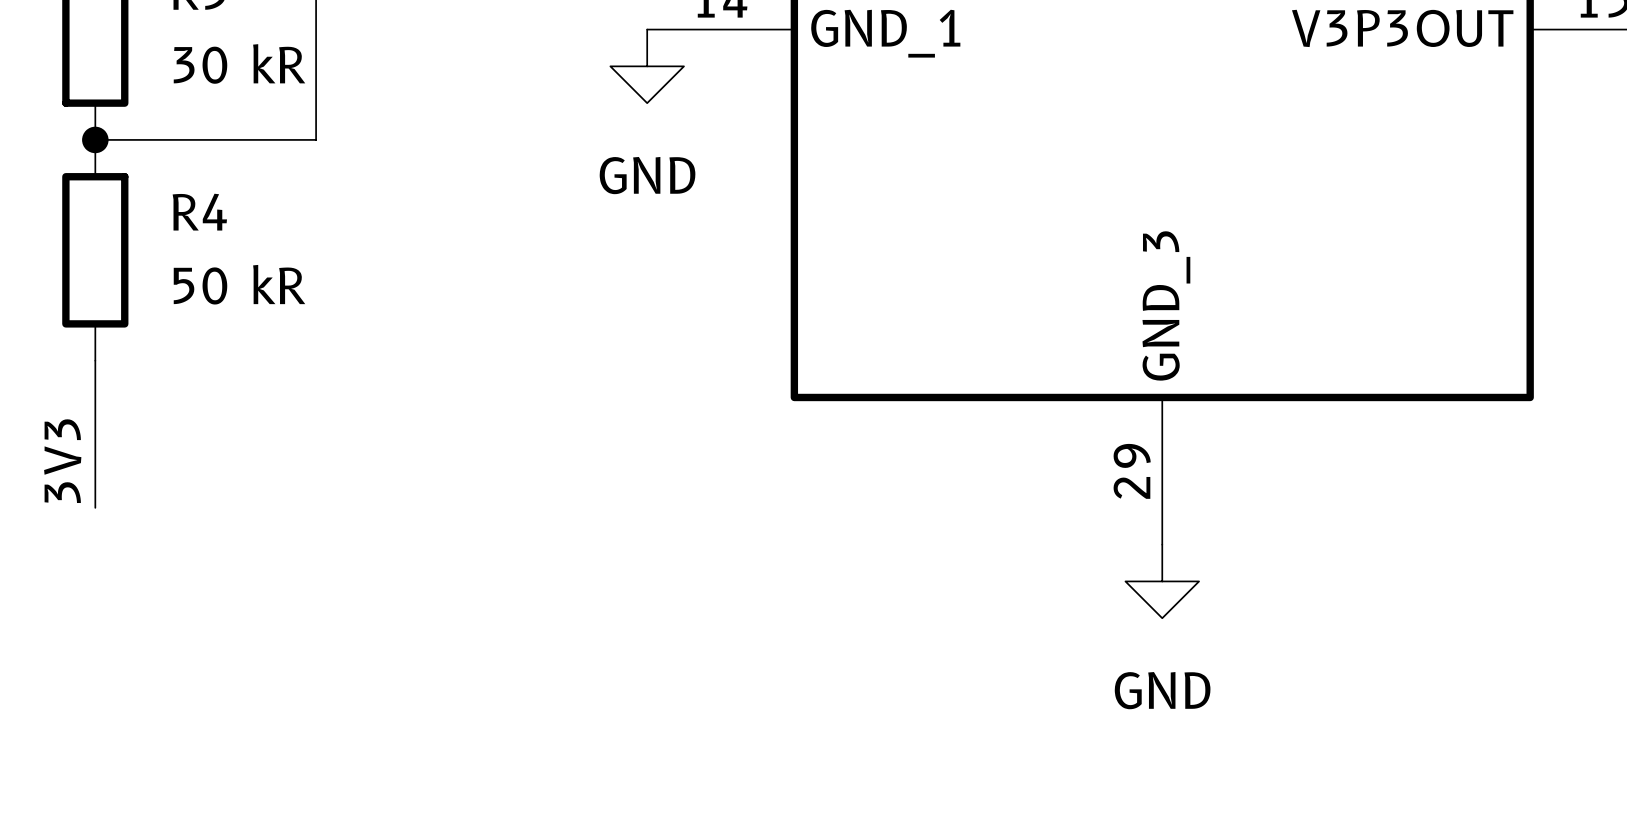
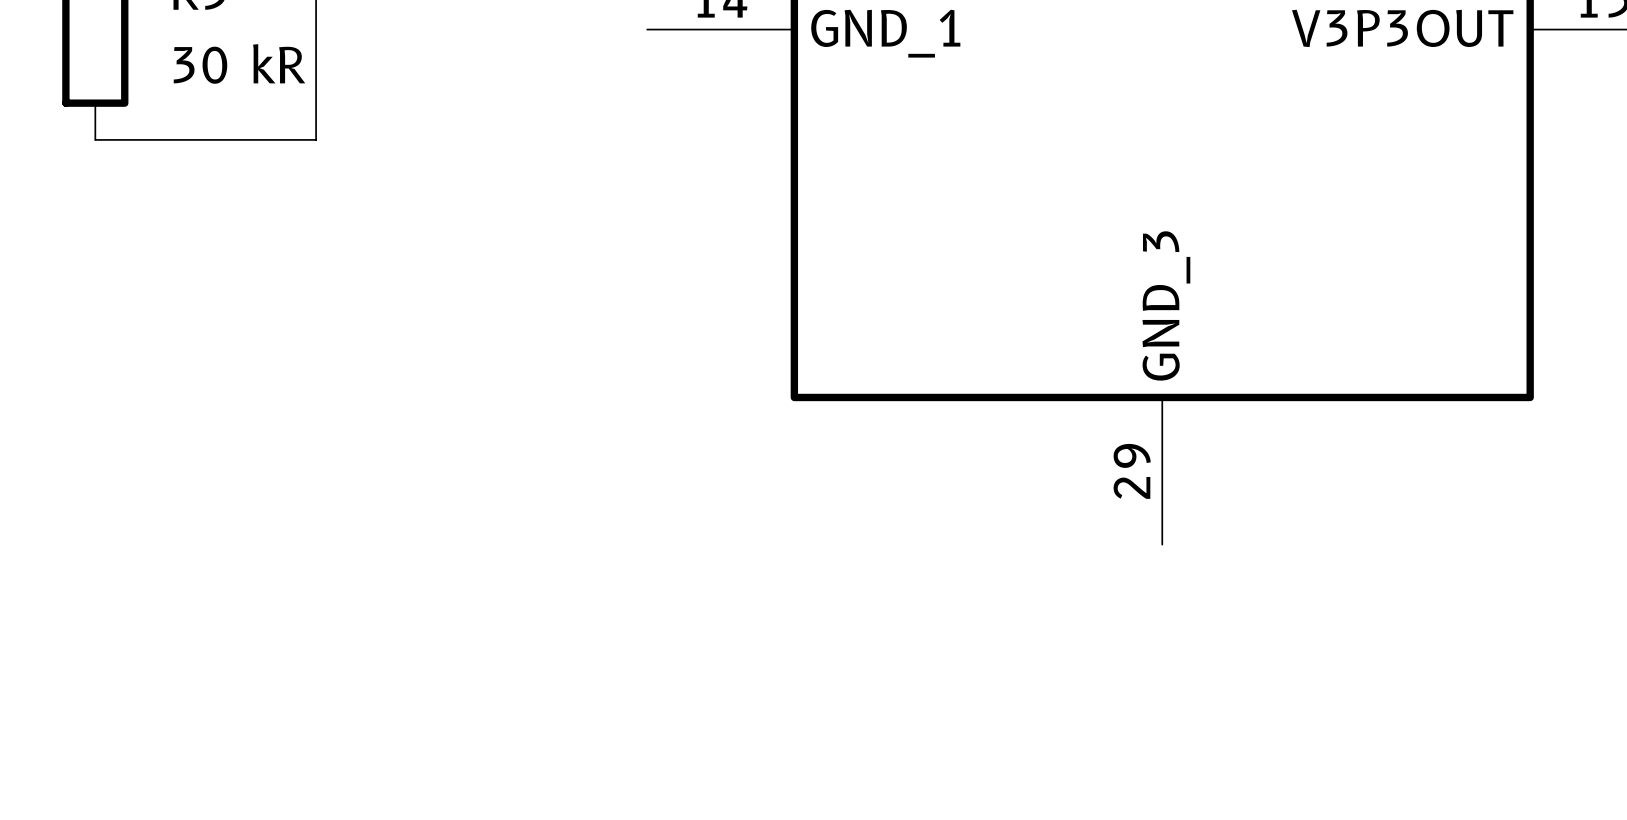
power symbol: GND (647, 66) -> none
junction: (95, 139) -> none
R4: 50 kR (95, 250) -> none
wire: (95, 360) (95, 507) -> none
label: 3V3 (62, 461) -> none
power symbol: GND (1162, 581) -> none

